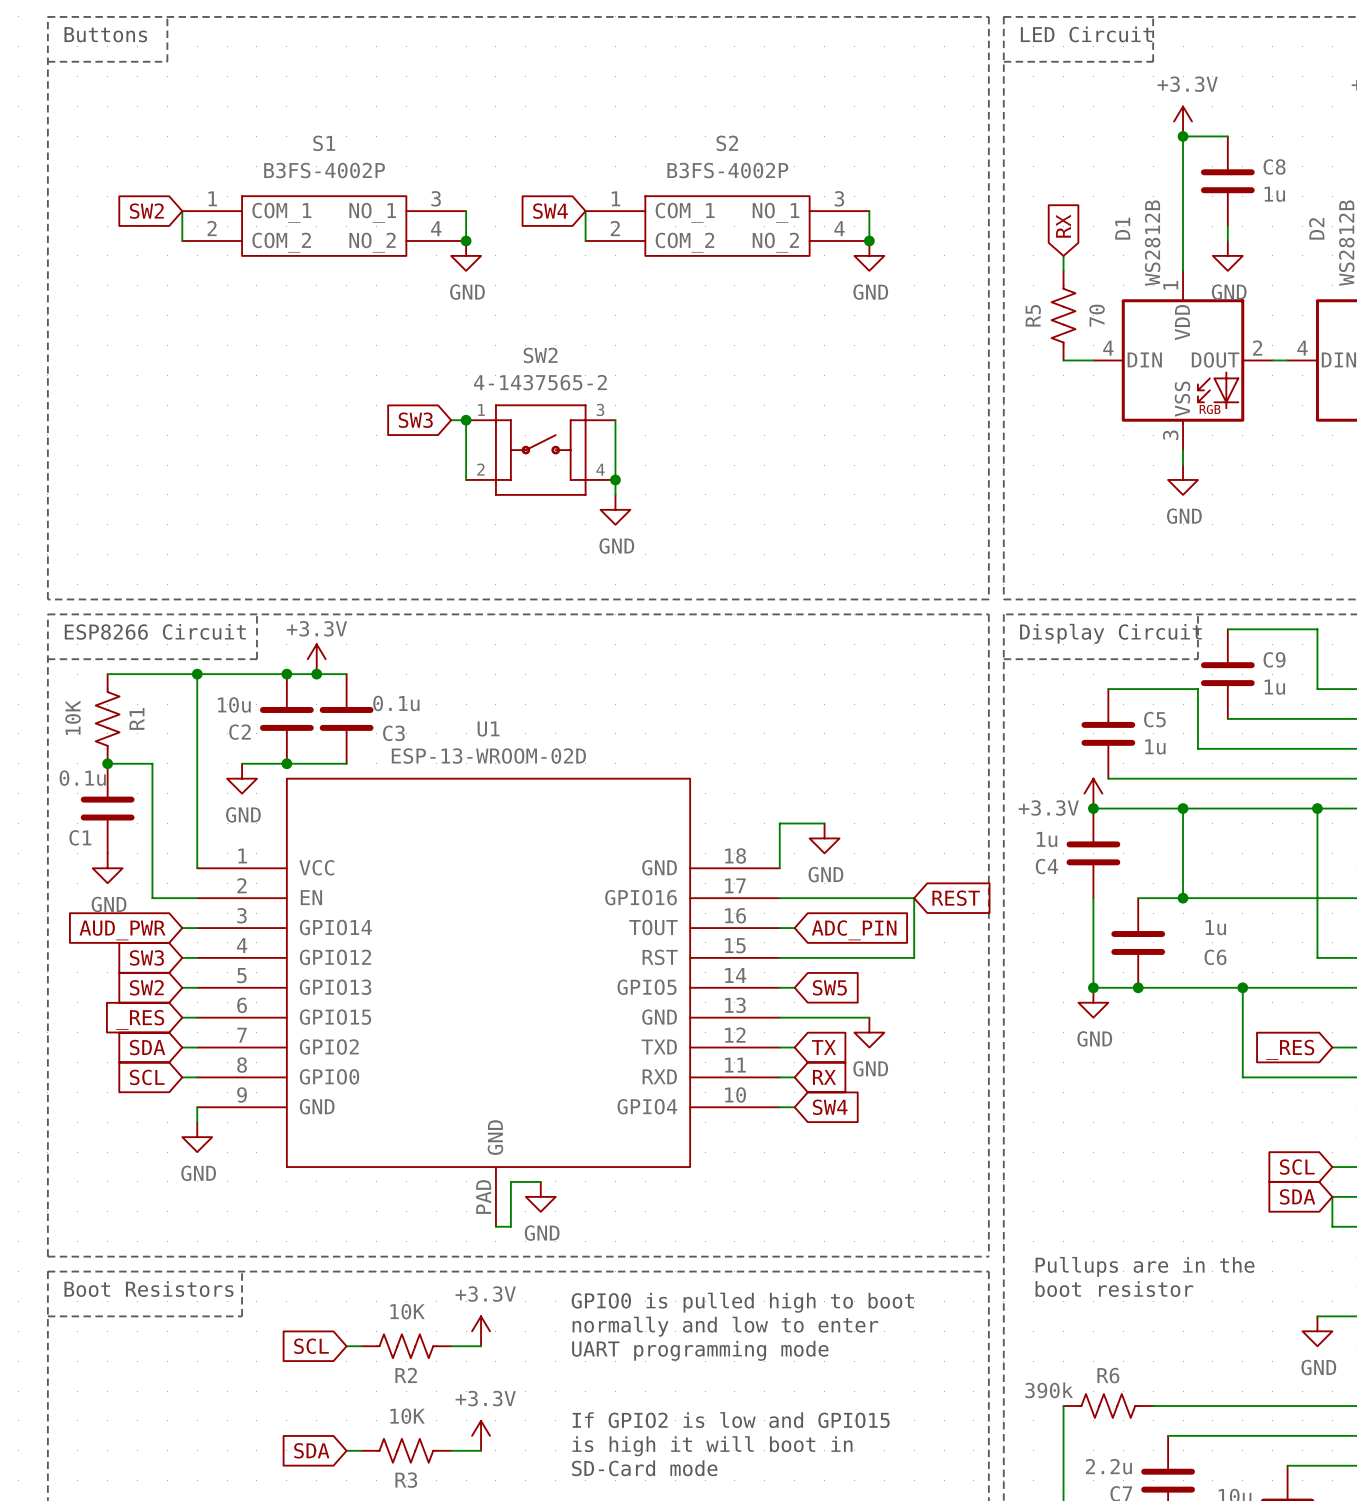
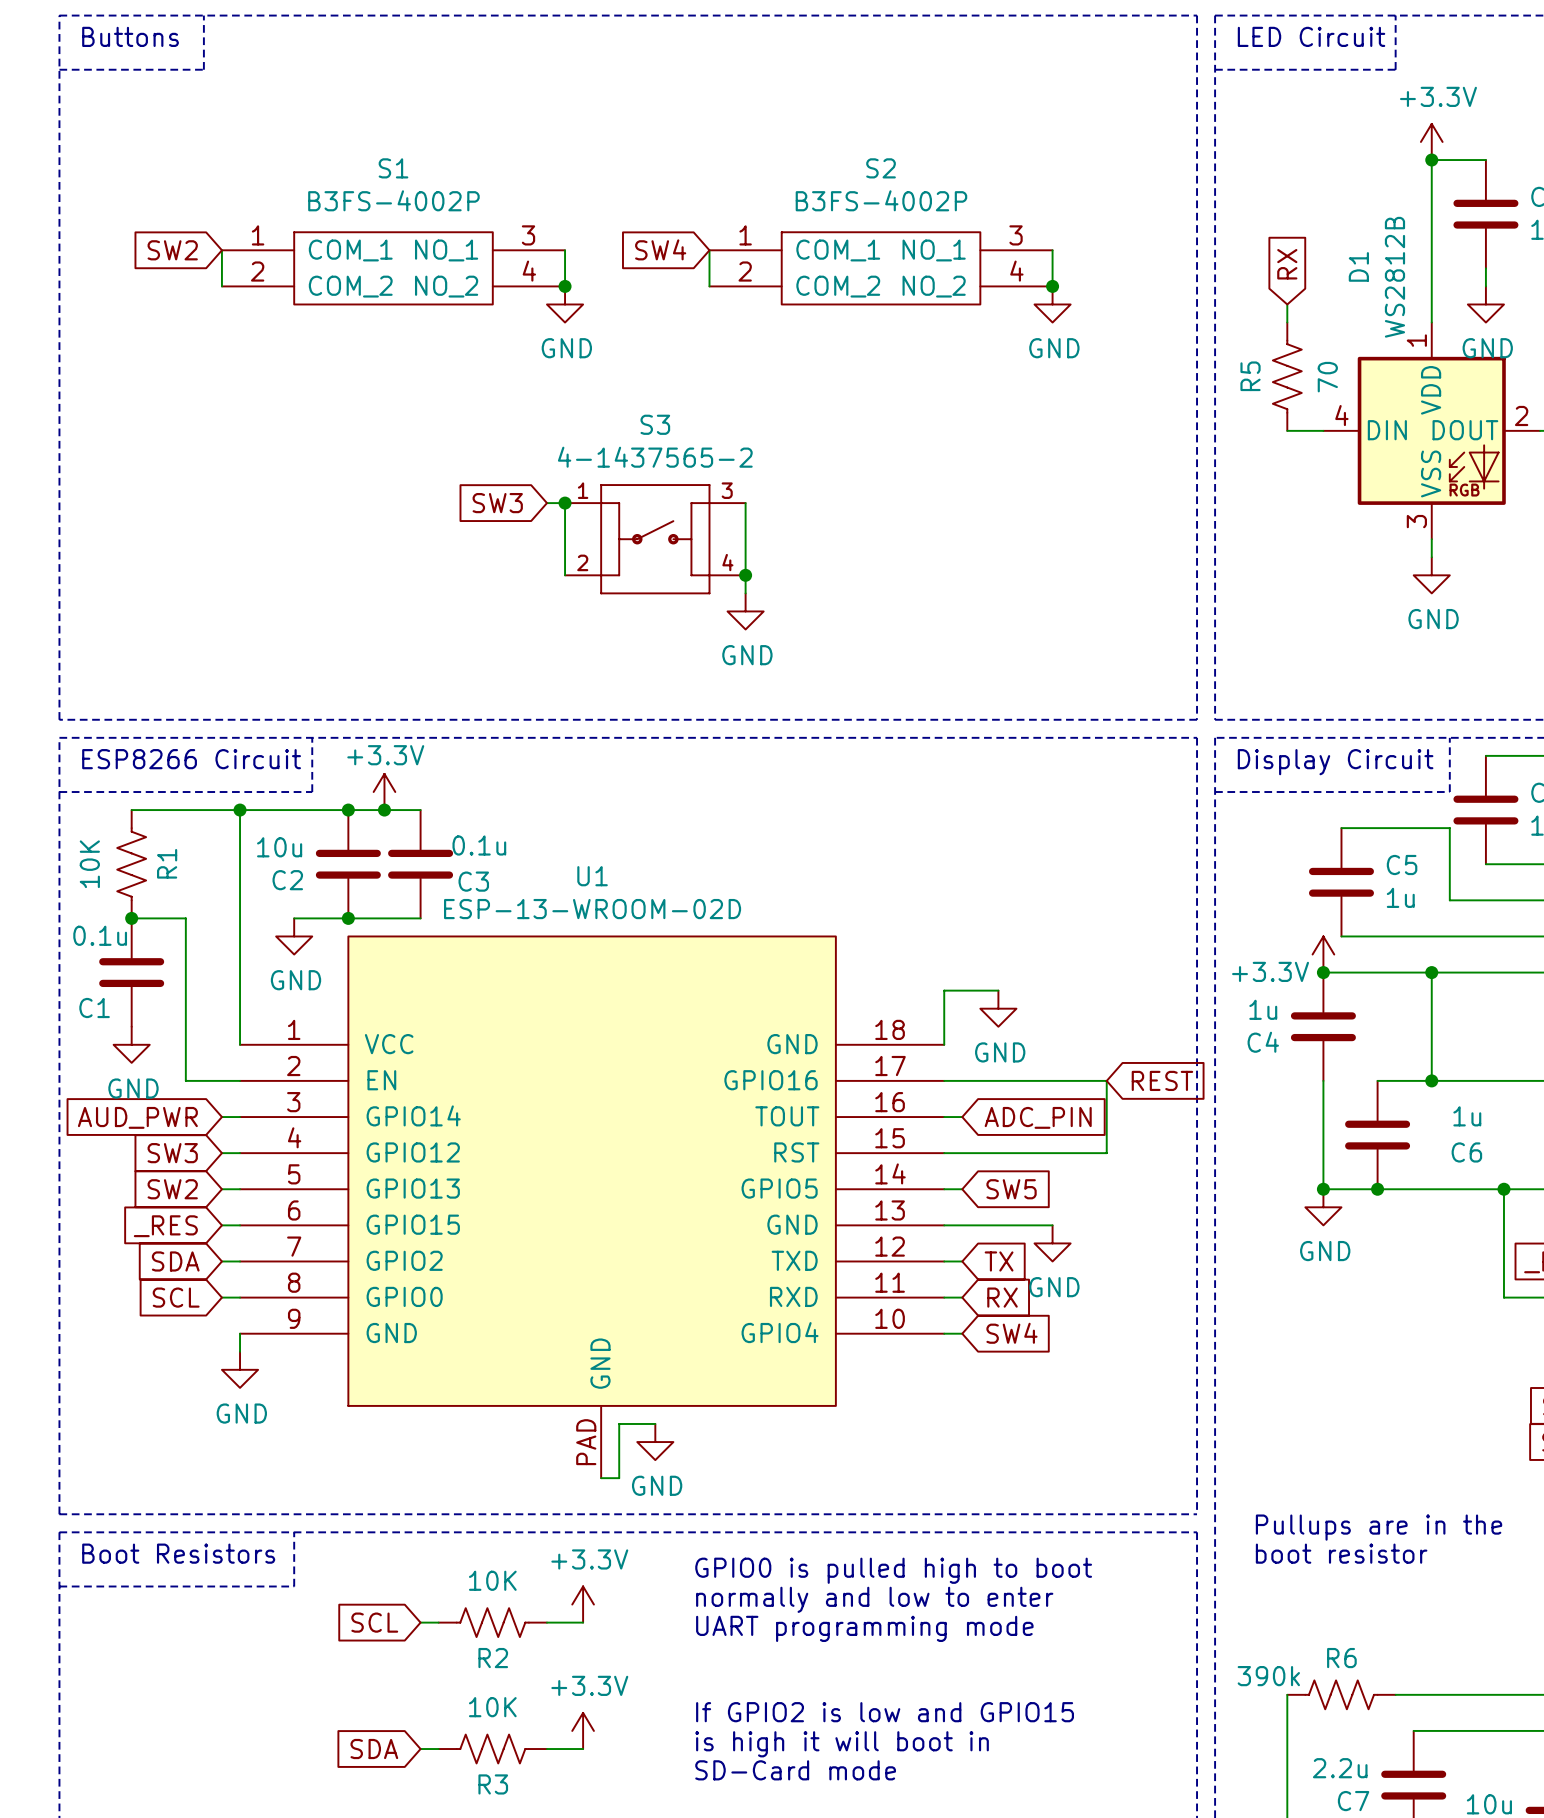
SW2 name: SW2 (540, 355) -> S3 (655, 424)

